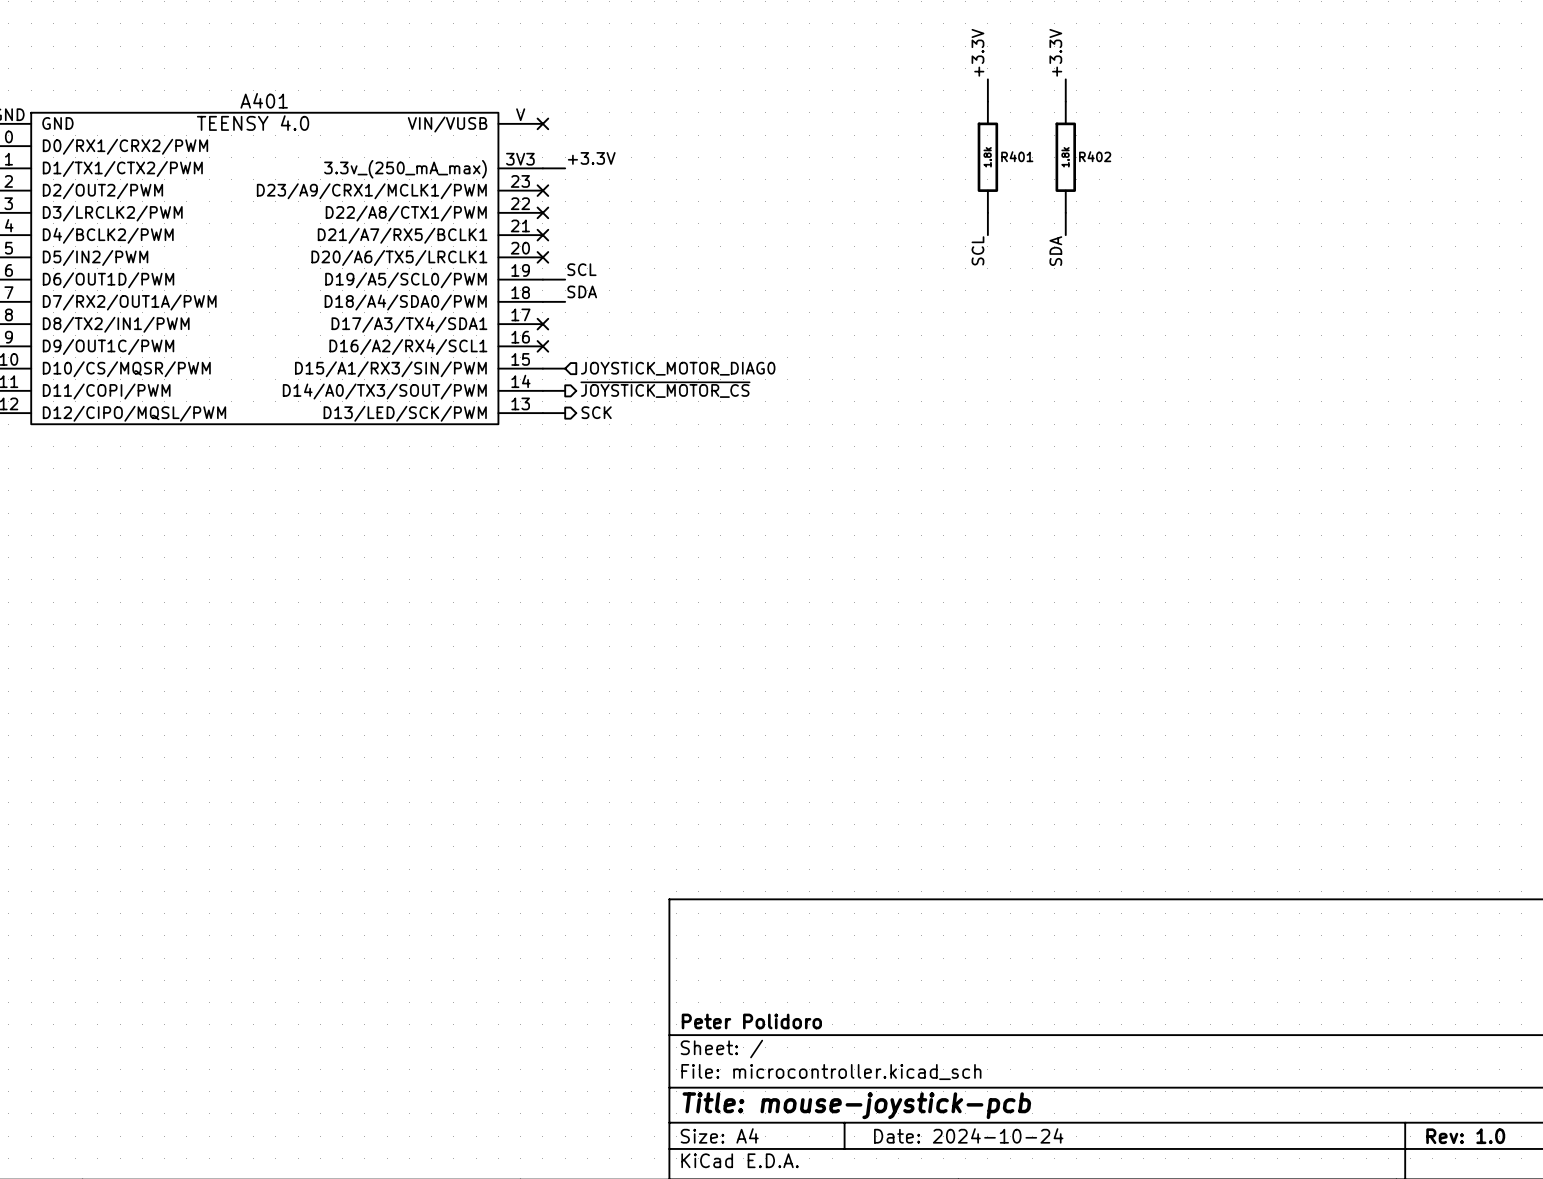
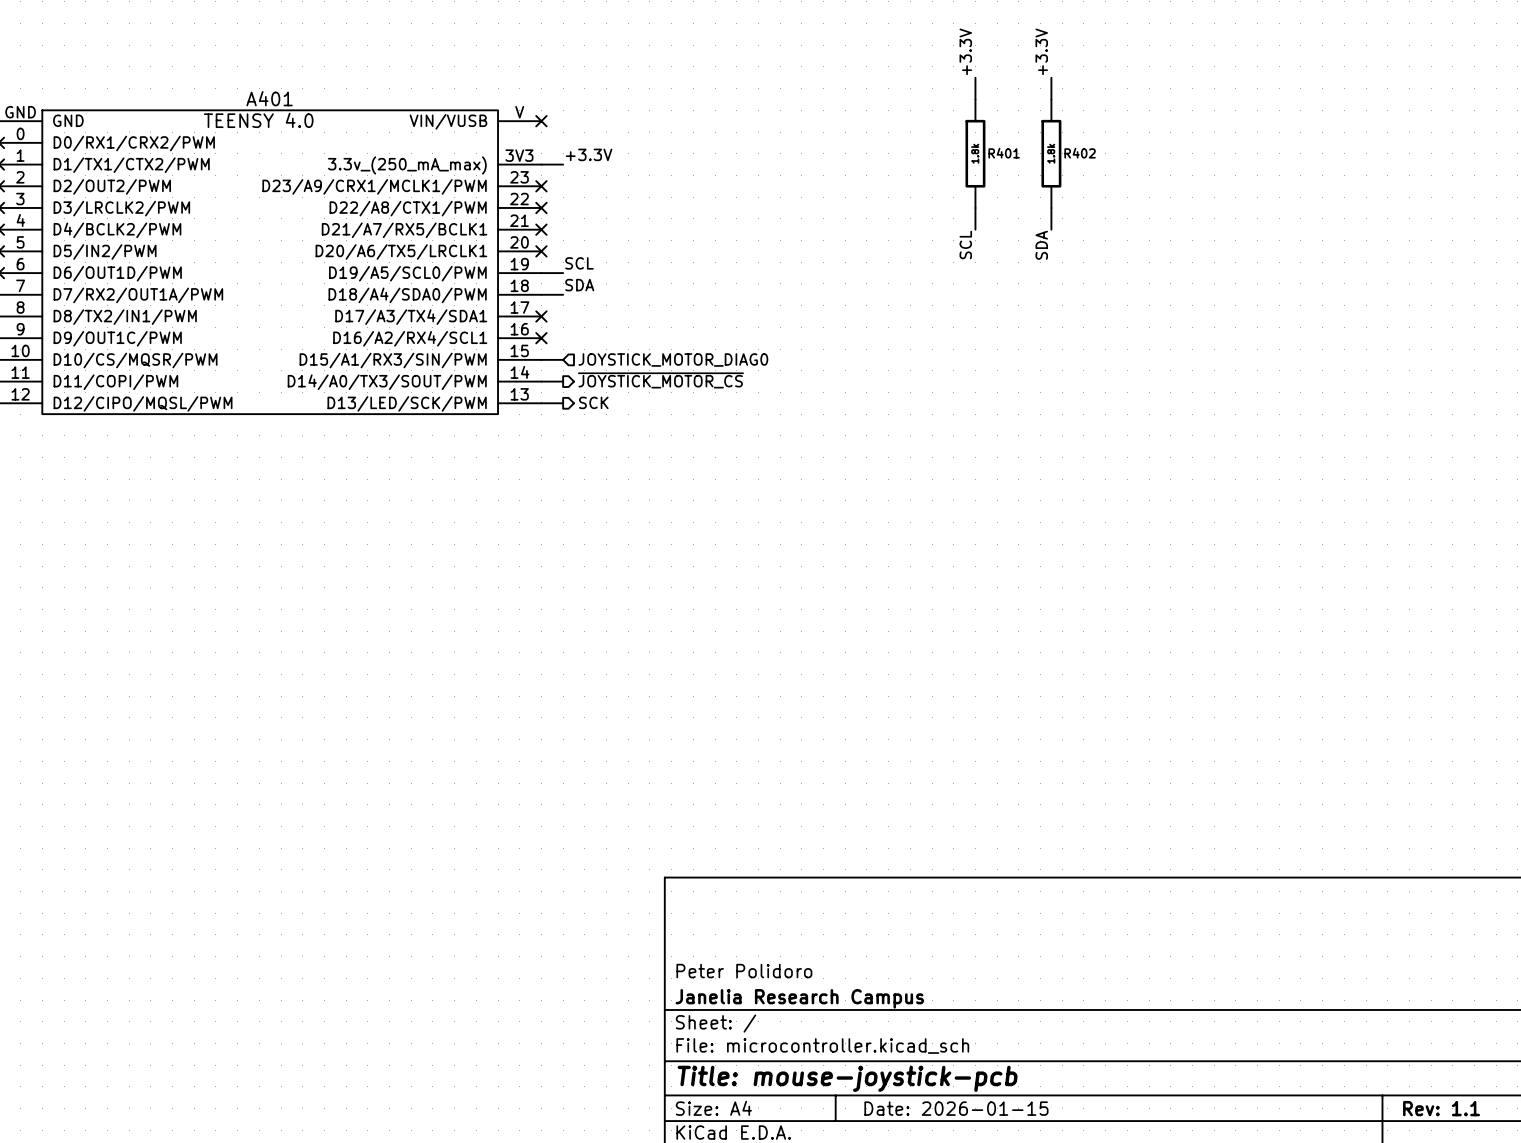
title block: none -> Peter Polidoro (744, 971)
title block: Peter Polidoro (751, 1021) -> Janelia Research Campus (799, 998)
title block: Date: 2024-10-24 (968, 1135) -> Date: 2026-01-15 (956, 1108)
title block: Rev: 1.0 (1465, 1136) -> Rev: 1.1 (1441, 1108)

